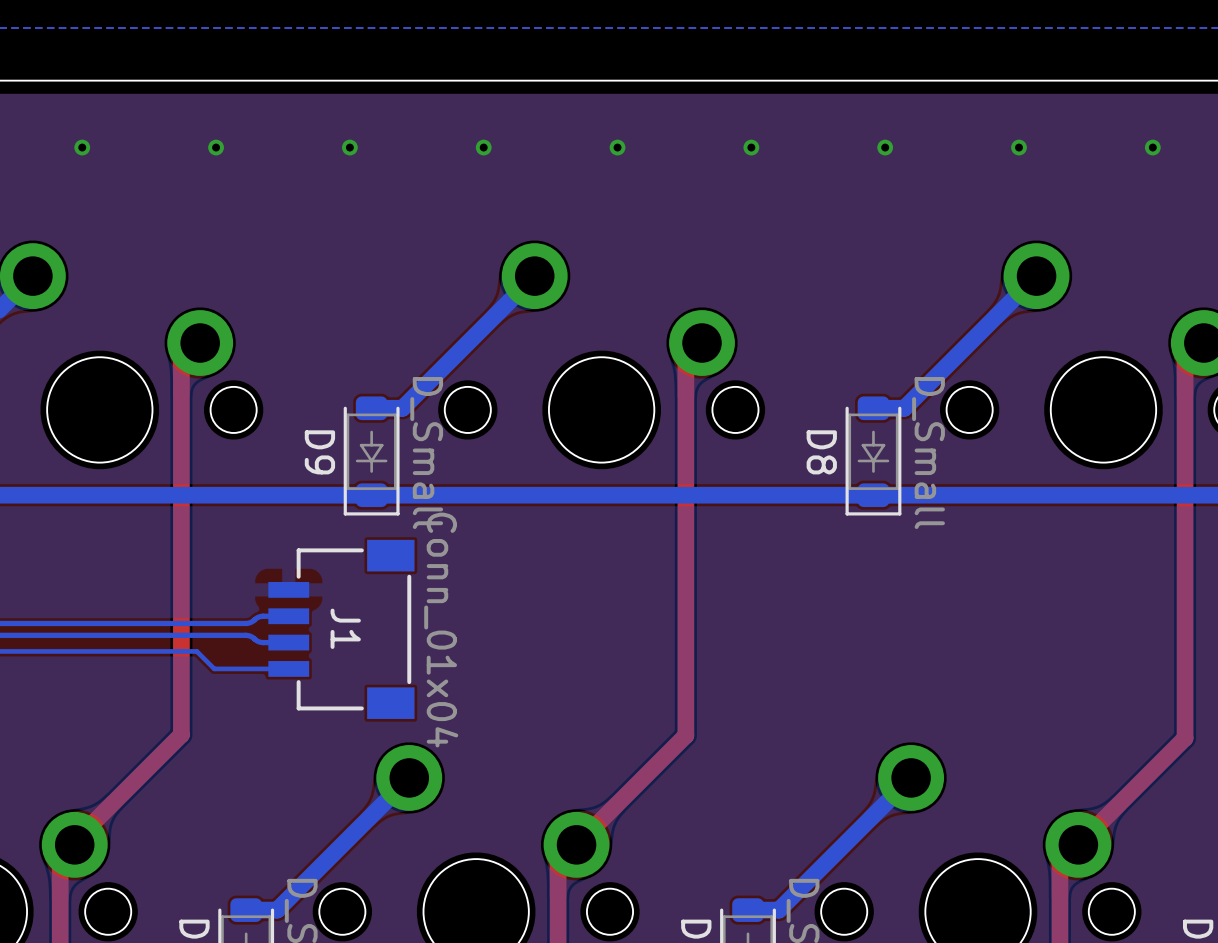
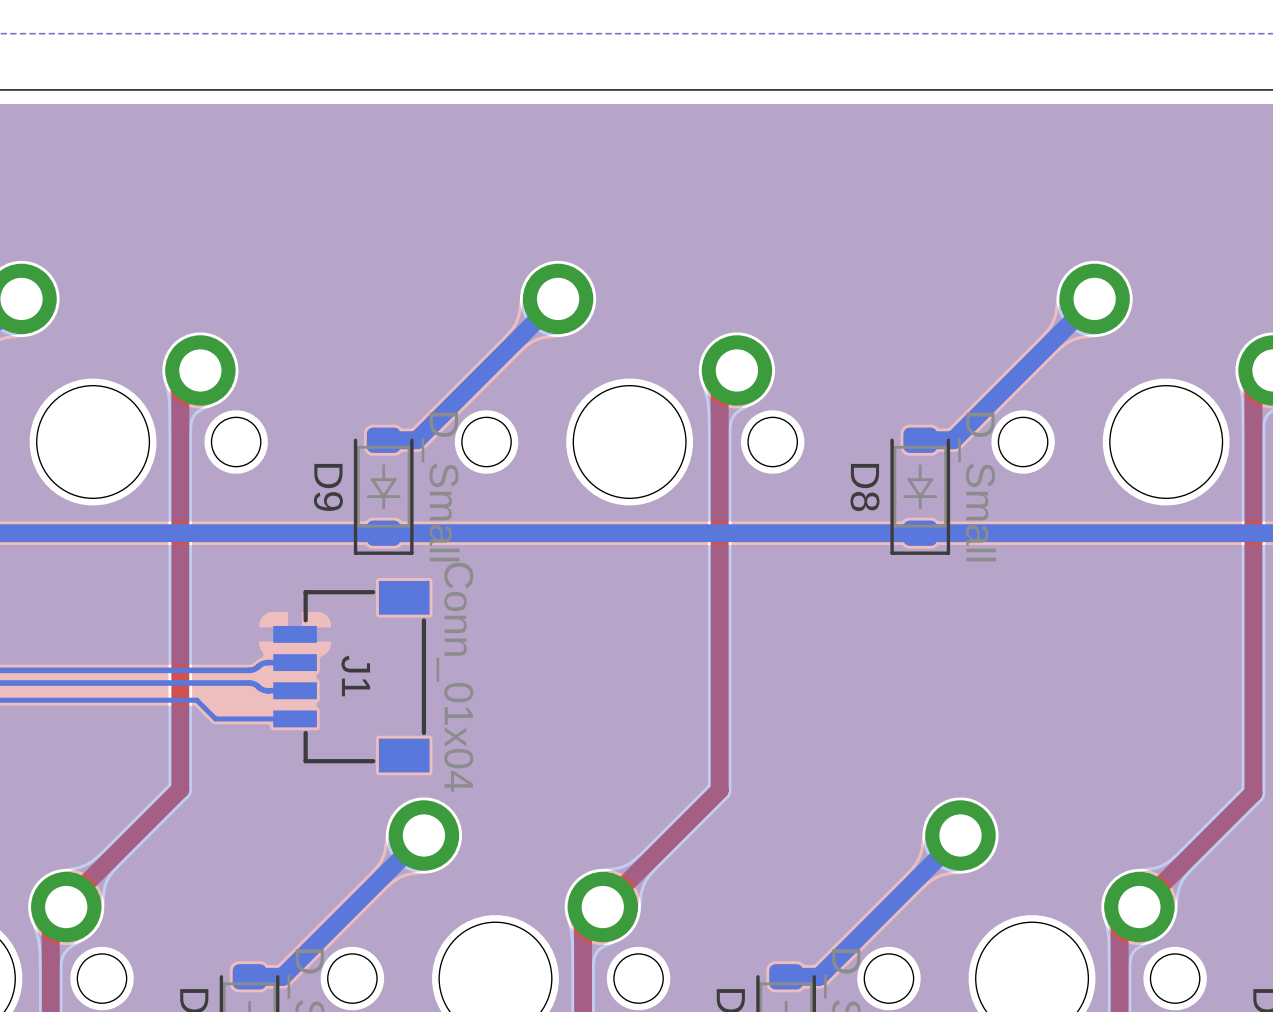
via: (82, 147) -> none
via: (216, 147) -> none
via: (349, 147) -> none
via: (483, 147) -> none
via: (617, 147) -> none
via: (751, 147) -> none
via: (885, 147) -> none
via: (1019, 147) -> none
via: (1152, 147) -> none

